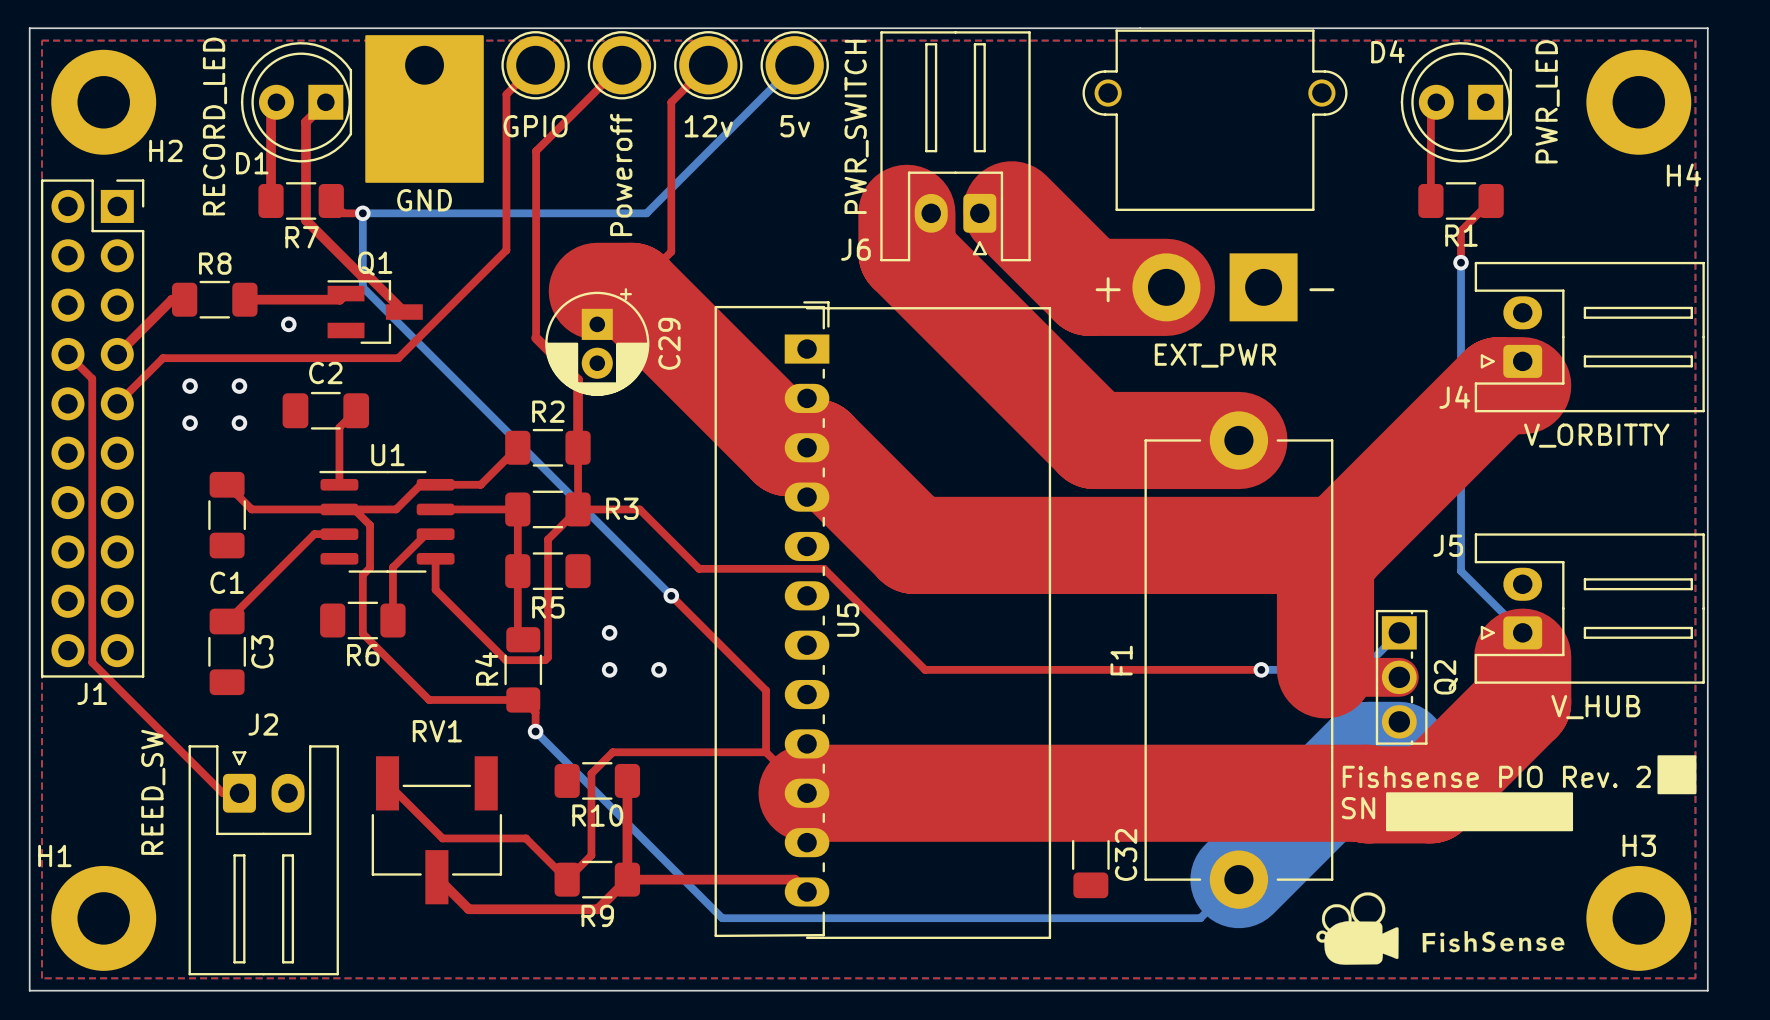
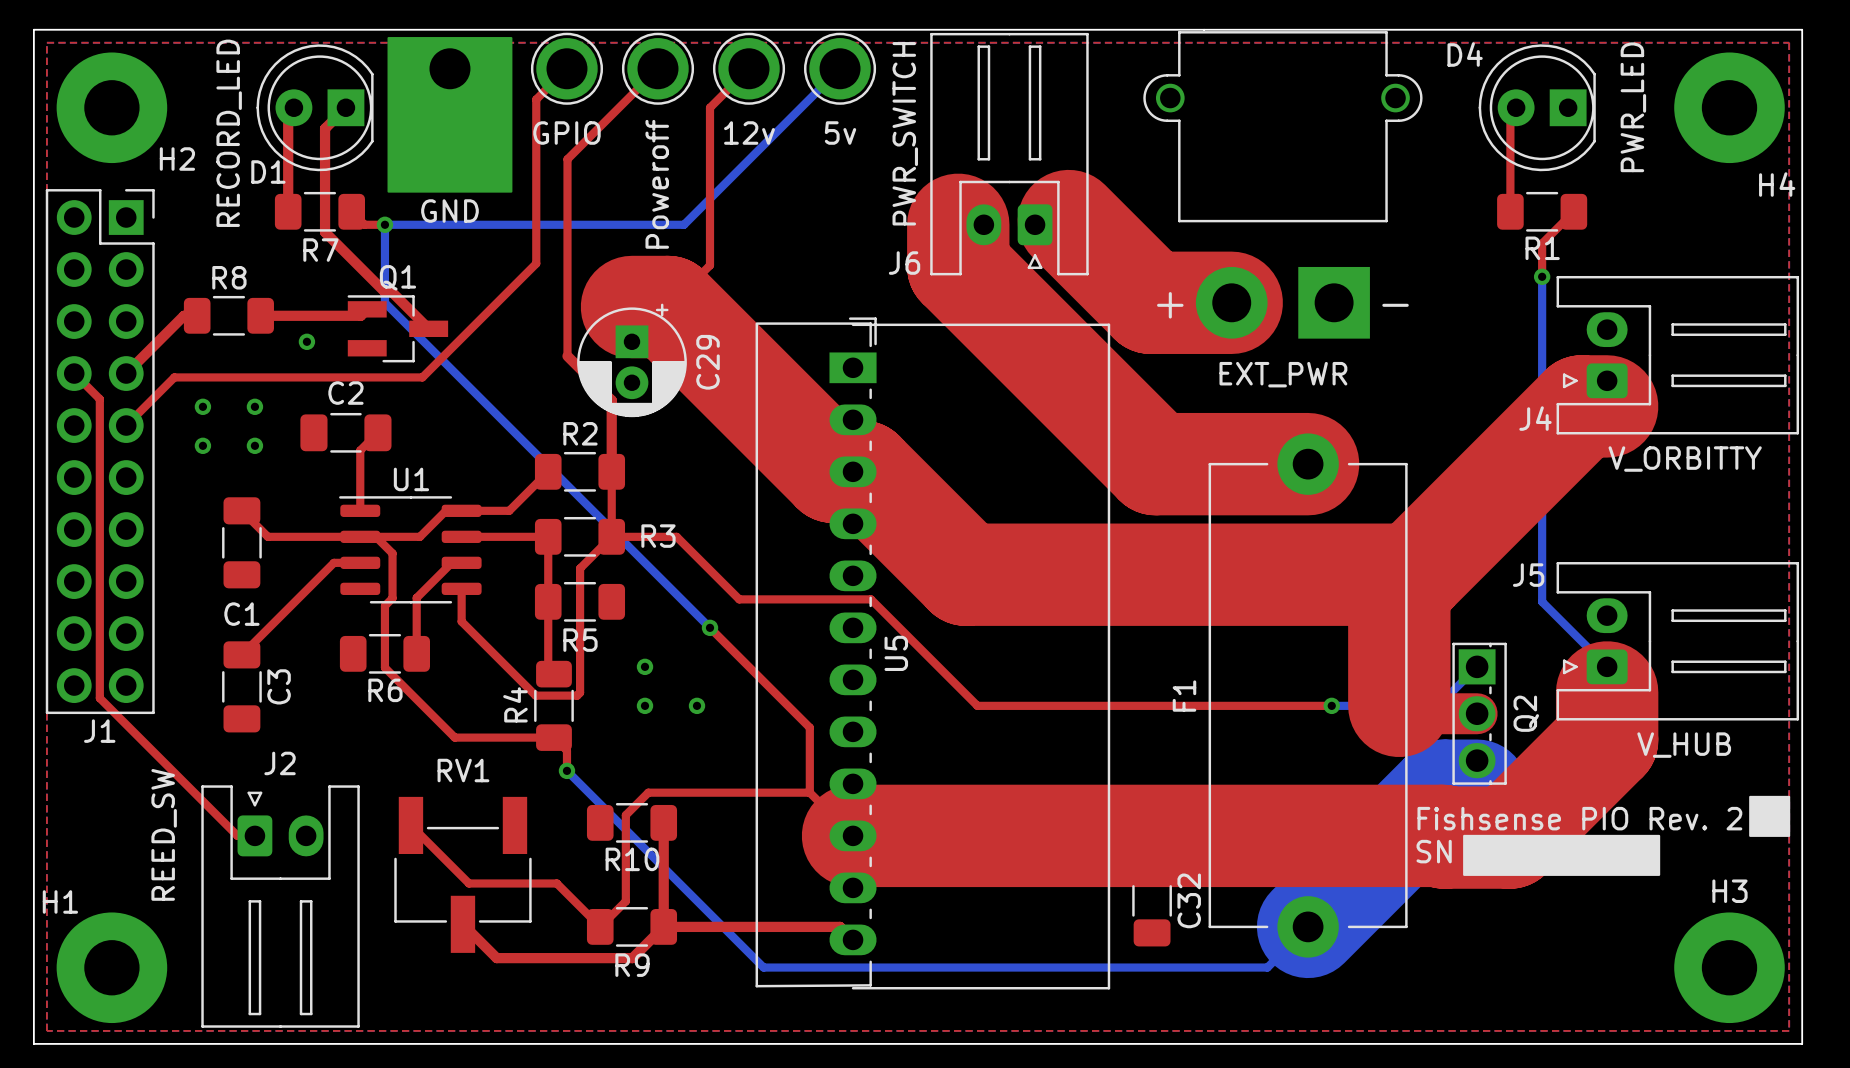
drawing: [1316, 892, 1565, 965] -> none

